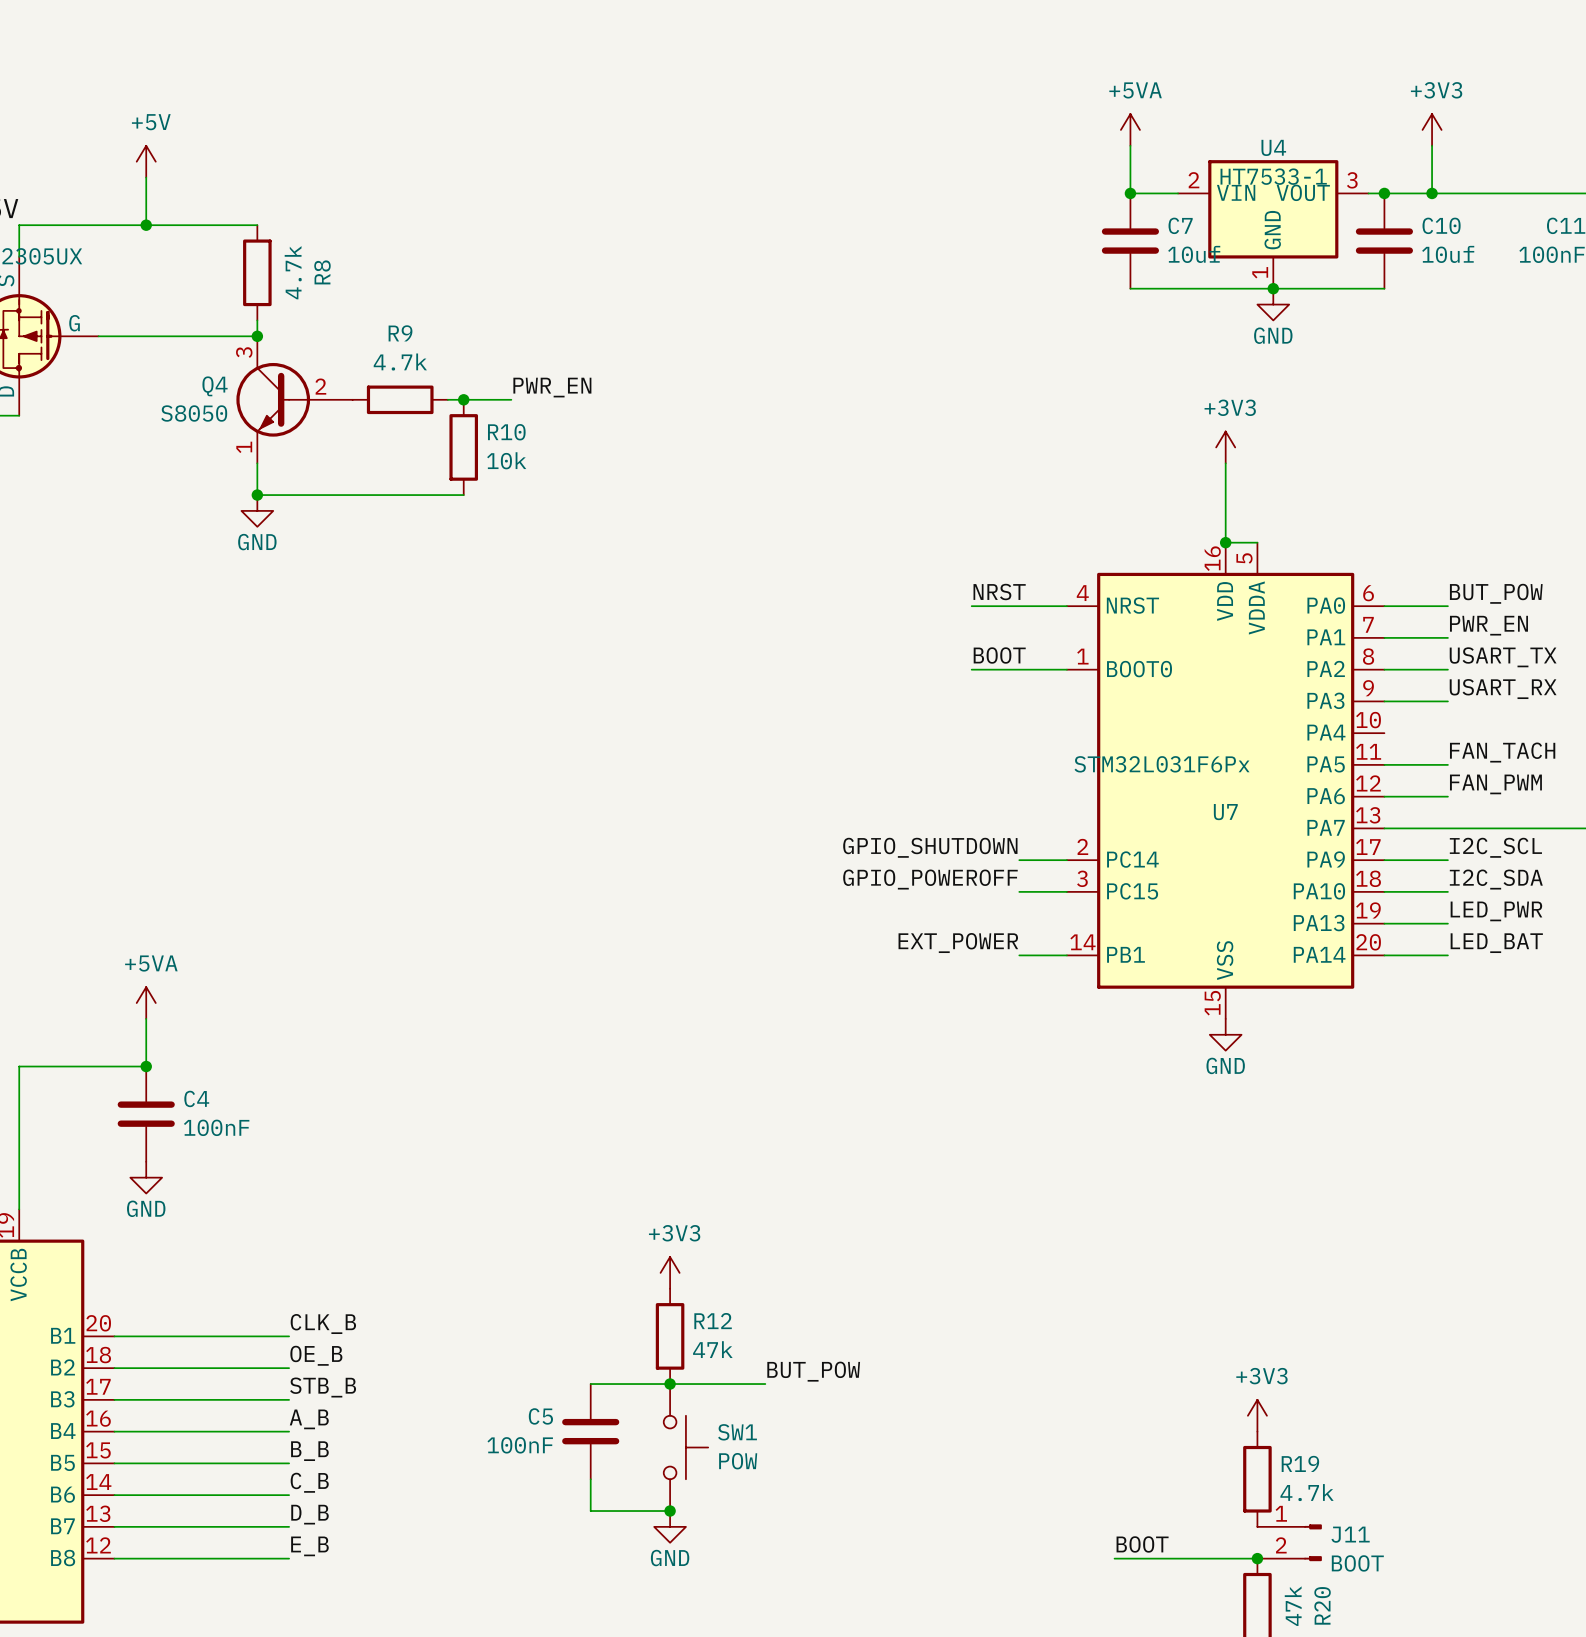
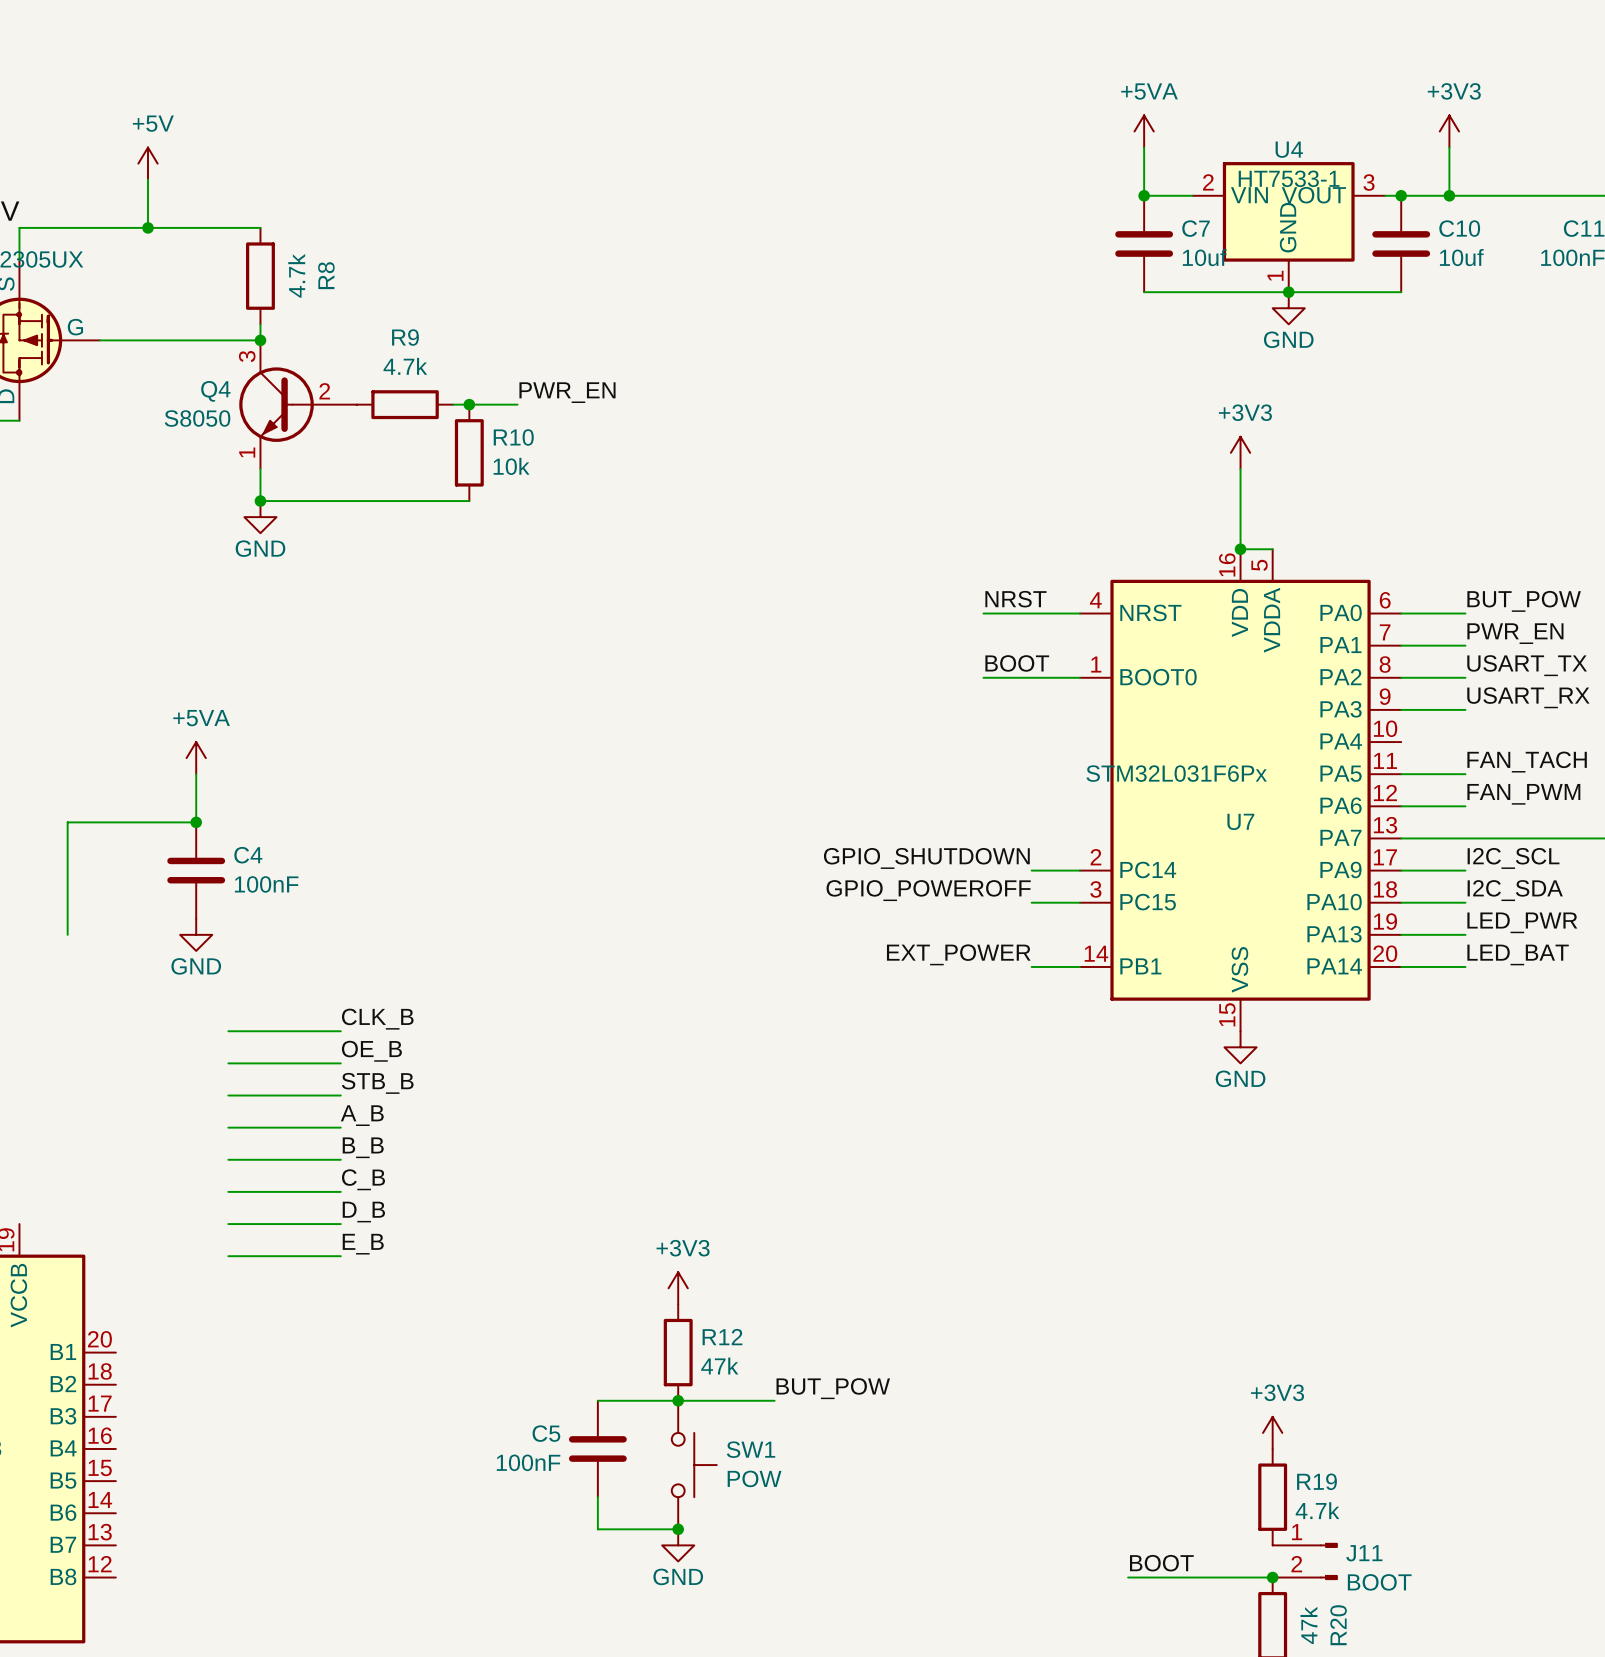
wire: none -> (196, 774) (196, 822) (67, 822) (67, 934)
junction: none -> (196, 822)
power symbol: none -> GND (196, 934)
power symbol position: +5VA (146, 1003) -> +5VA (196, 758)
label: none -> CLK_B (377, 1019)
wire: (146, 1018) (146, 1066) (19, 1066) (19, 1209) -> none
wire: none -> (228, 1031) (340, 1031)
label: none -> OE_B (371, 1051)
wire: none -> (228, 1063) (340, 1063)
junction: (146, 1066) -> none
label: none -> STB_B (377, 1083)
wire: none -> (228, 1095) (340, 1095)
label: none -> A_B (362, 1115)
C4 position: (146, 1114) -> (196, 870)
wire: none -> (228, 1127) (340, 1127)
label: none -> B_B (363, 1147)
wire: none -> (228, 1159) (340, 1159)
label: none -> C_B (363, 1179)
power symbol: GND (146, 1177) -> none
wire: none -> (228, 1191) (340, 1191)
label: none -> D_B (363, 1212)
wire: none -> (228, 1224) (340, 1224)
label: none -> E_B (363, 1244)
wire: none -> (228, 1256) (340, 1256)
label: CLK_B (323, 1324) -> none
wire: (114, 1336) (289, 1336) -> none
label: OE_B (316, 1355) -> none
wire: (114, 1368) (289, 1368) -> none
label: STB_B (323, 1387) -> none
wire: (114, 1399) (289, 1399) -> none
label: A_B (309, 1419) -> none
wire: (114, 1431) (289, 1431) -> none
label: B_B (309, 1451) -> none
wire: (114, 1463) (289, 1463) -> none
label: C_B (309, 1482) -> none
wire: (114, 1495) (289, 1495) -> none
label: D_B (310, 1514) -> none
wire: (114, 1526) (289, 1526) -> none
label: E_B (309, 1546) -> none
wire: (114, 1558) (289, 1558) -> none

